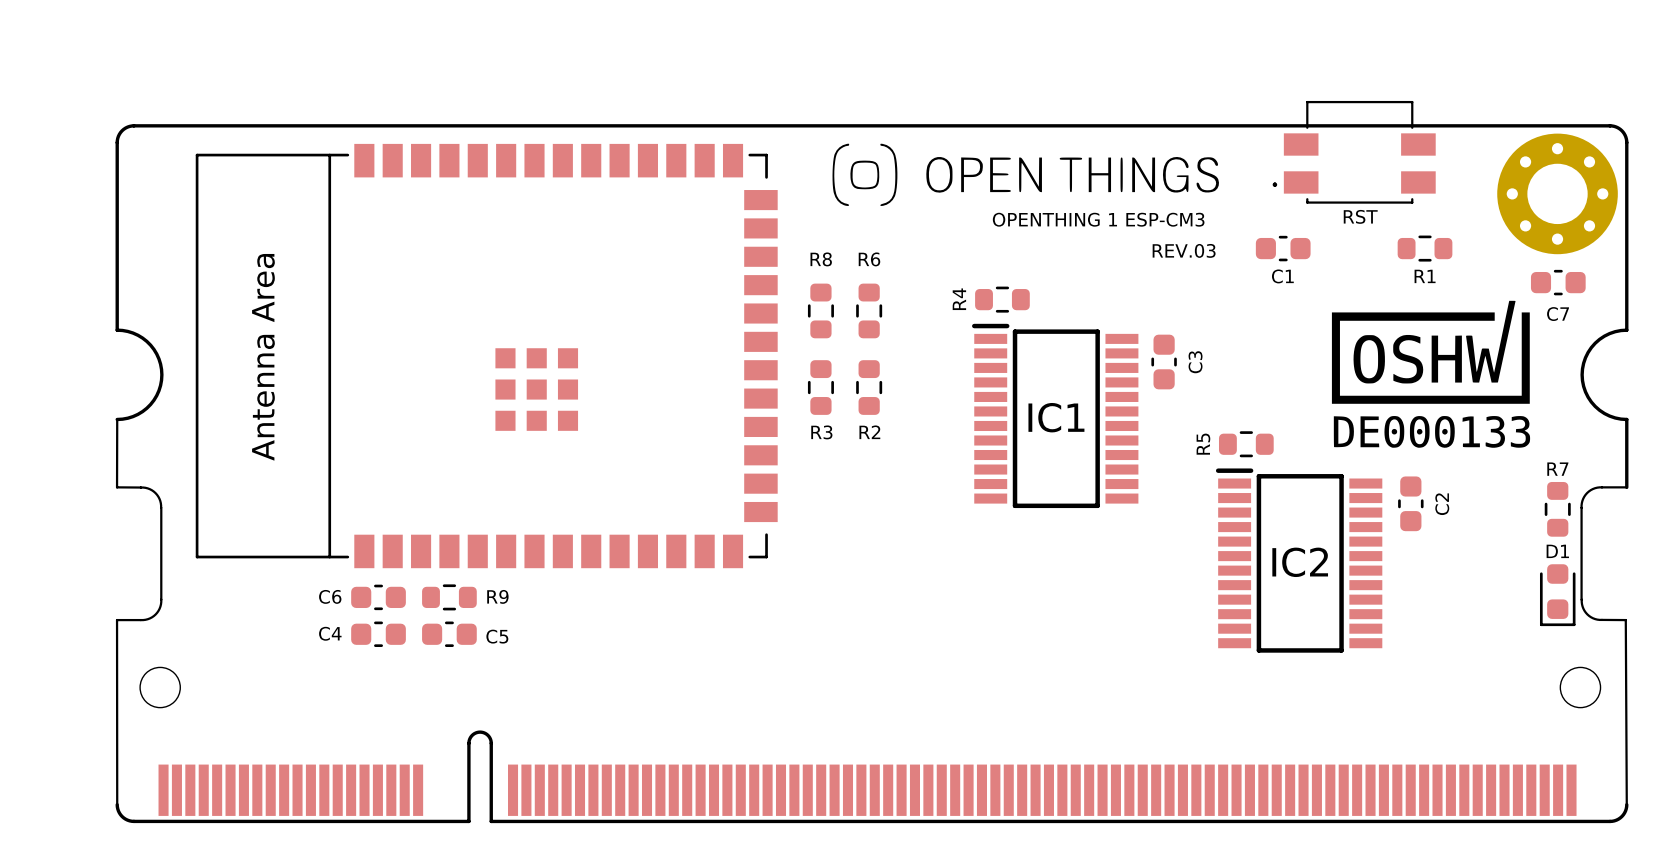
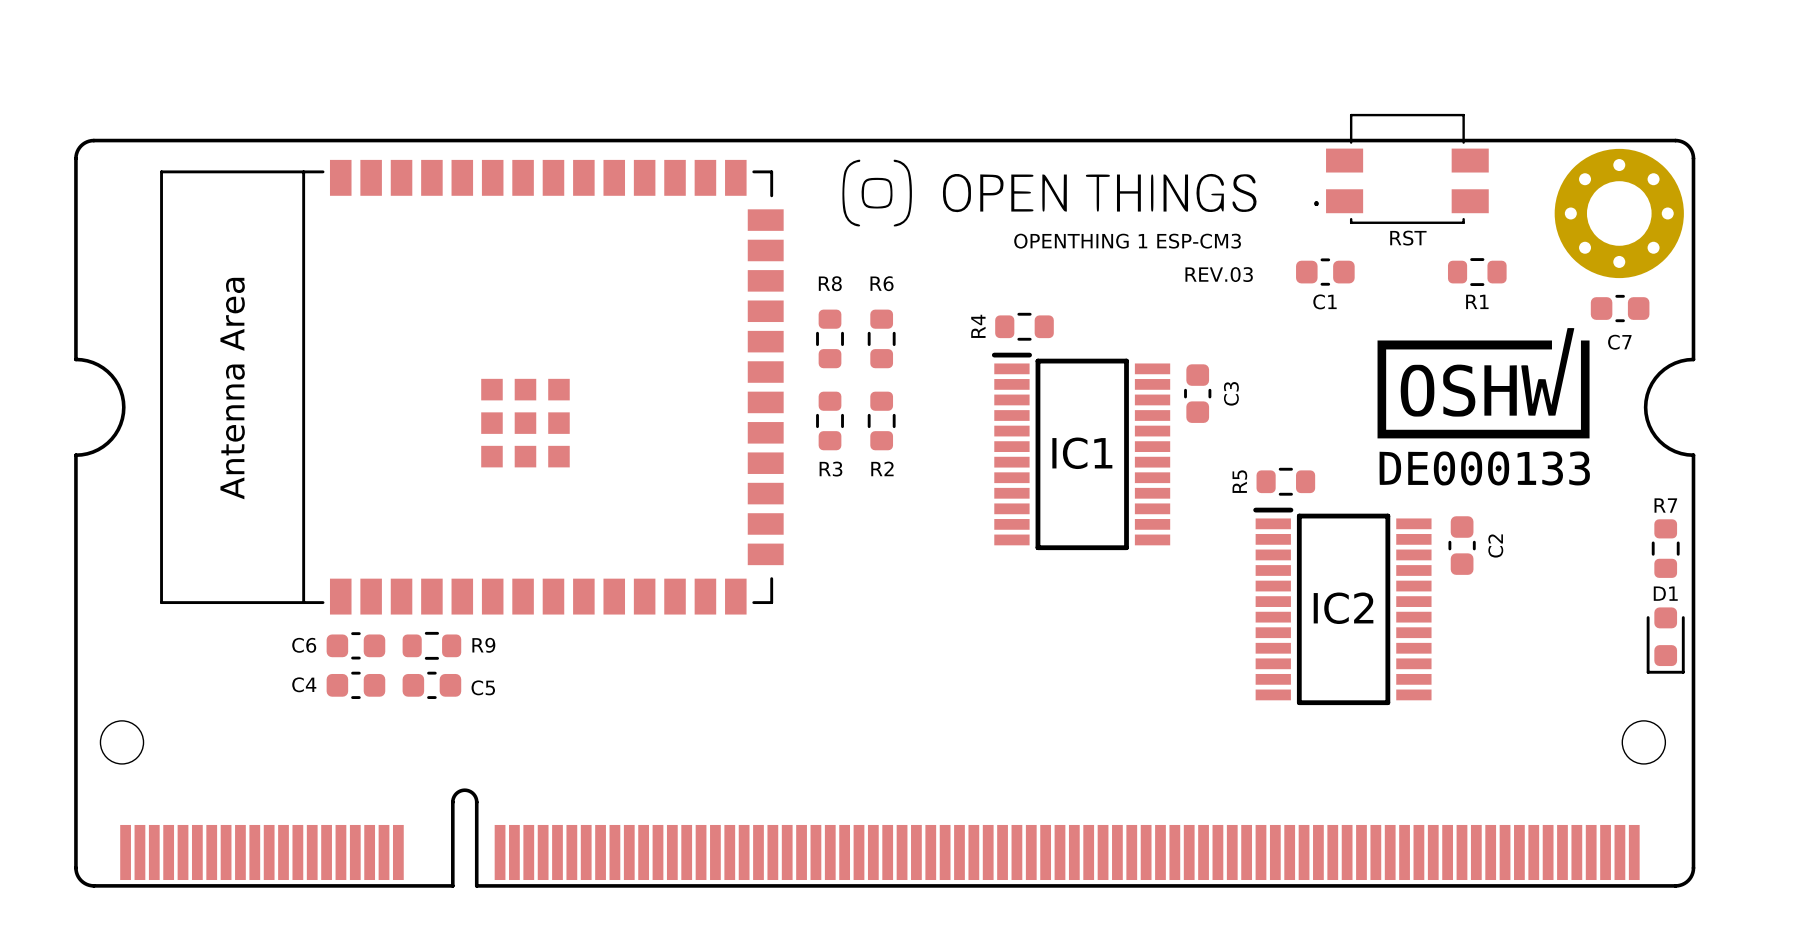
board edge: (117, 419) (117, 487) (149, 489) (158, 496) (161, 507) -> none
board edge: (1626, 487) (1595, 488) (1588, 491) (1583, 498) (1581, 505) (1581, 599) -> none
board edge: (161, 507) (161, 601) (159, 608) (153, 616) (147, 619) (117, 620) (117, 804) -> (75, 455) (75, 867)
R7 position: (1557, 509) -> (1665, 548)
D1 position: (1557, 595) -> (1665, 640)
board edge: (1581, 599) (1584, 610) (1592, 618) (1625, 620) (1626, 804) -> (1693, 527) (1693, 867)

